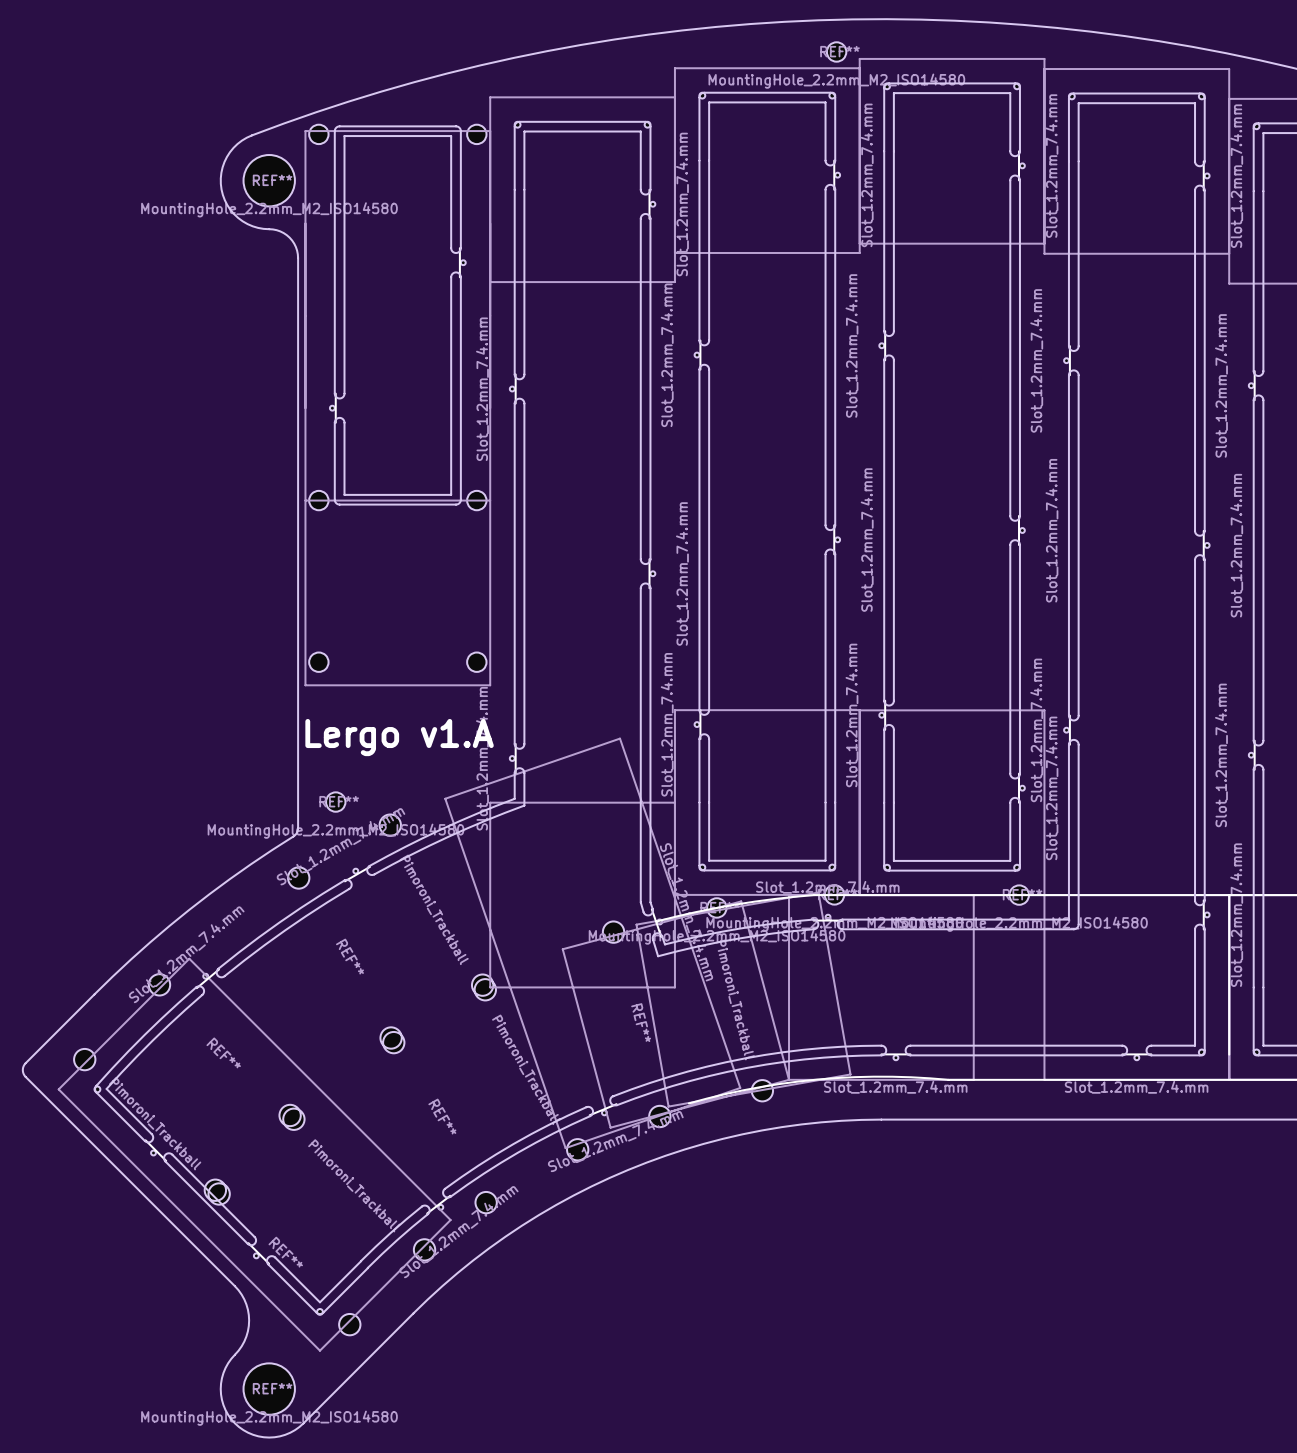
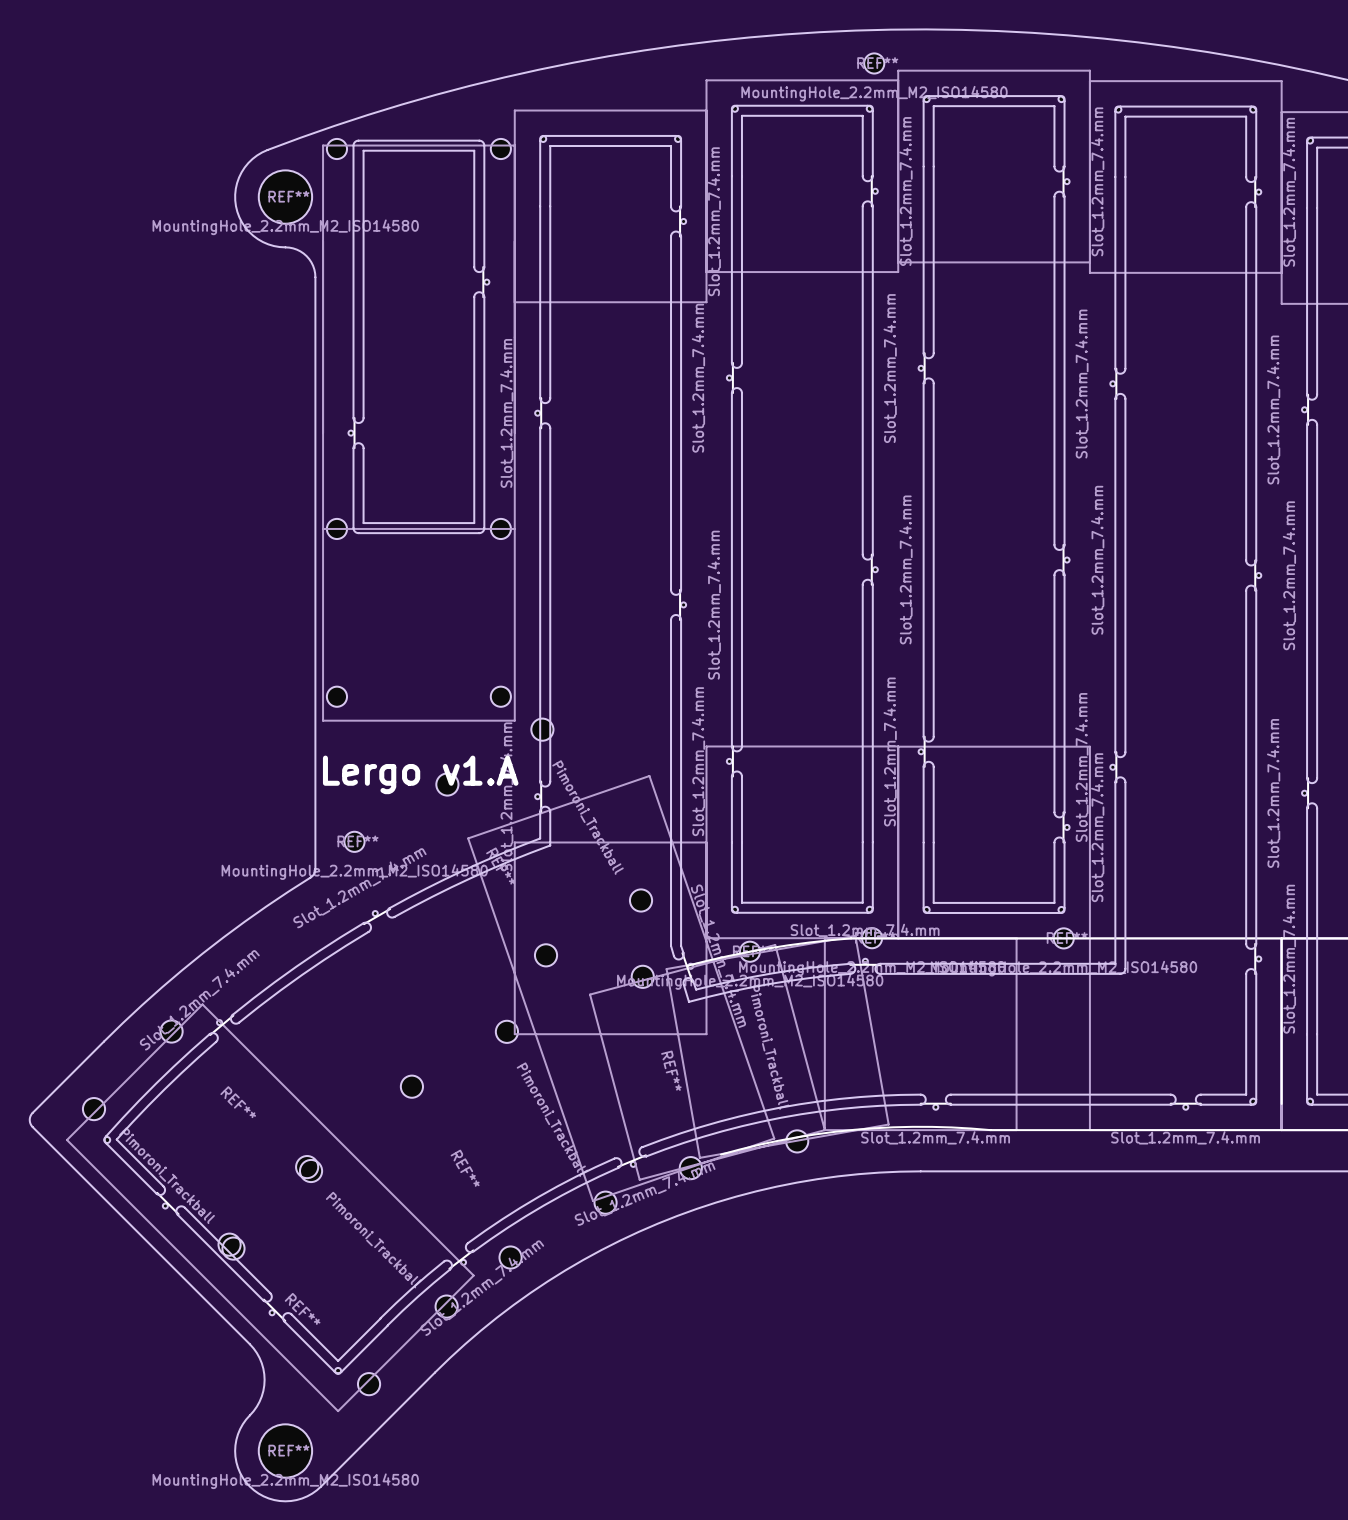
REF** position: (392, 933) -> (544, 842)

